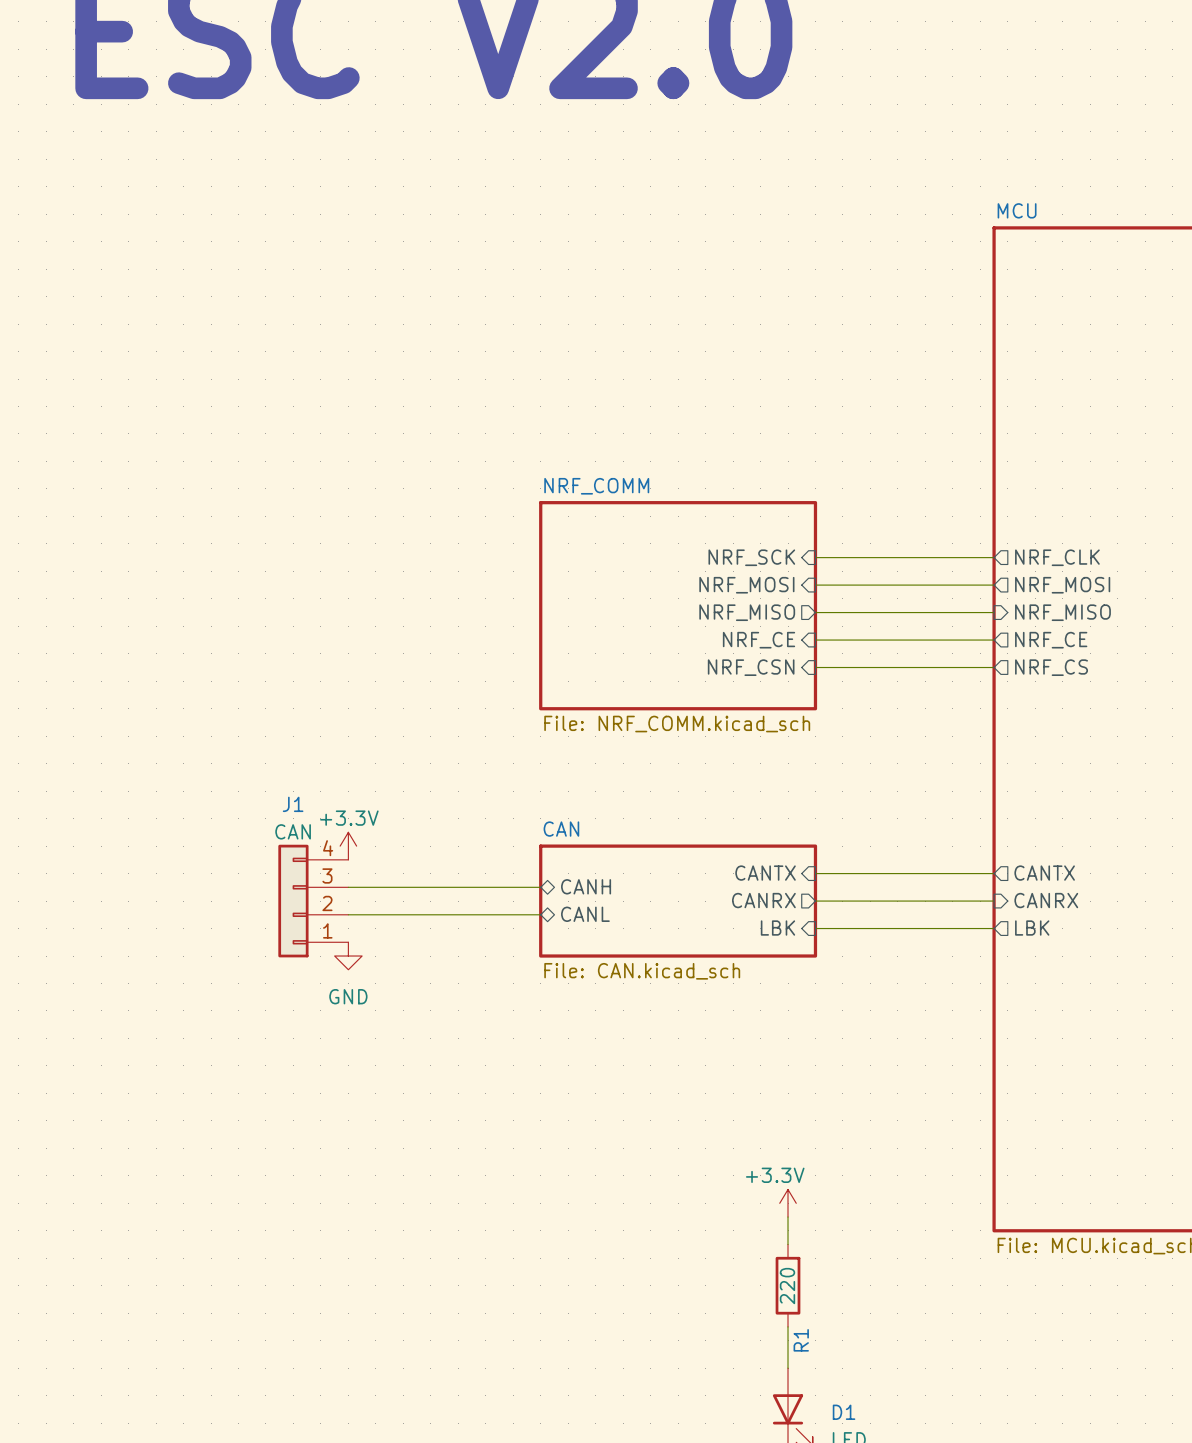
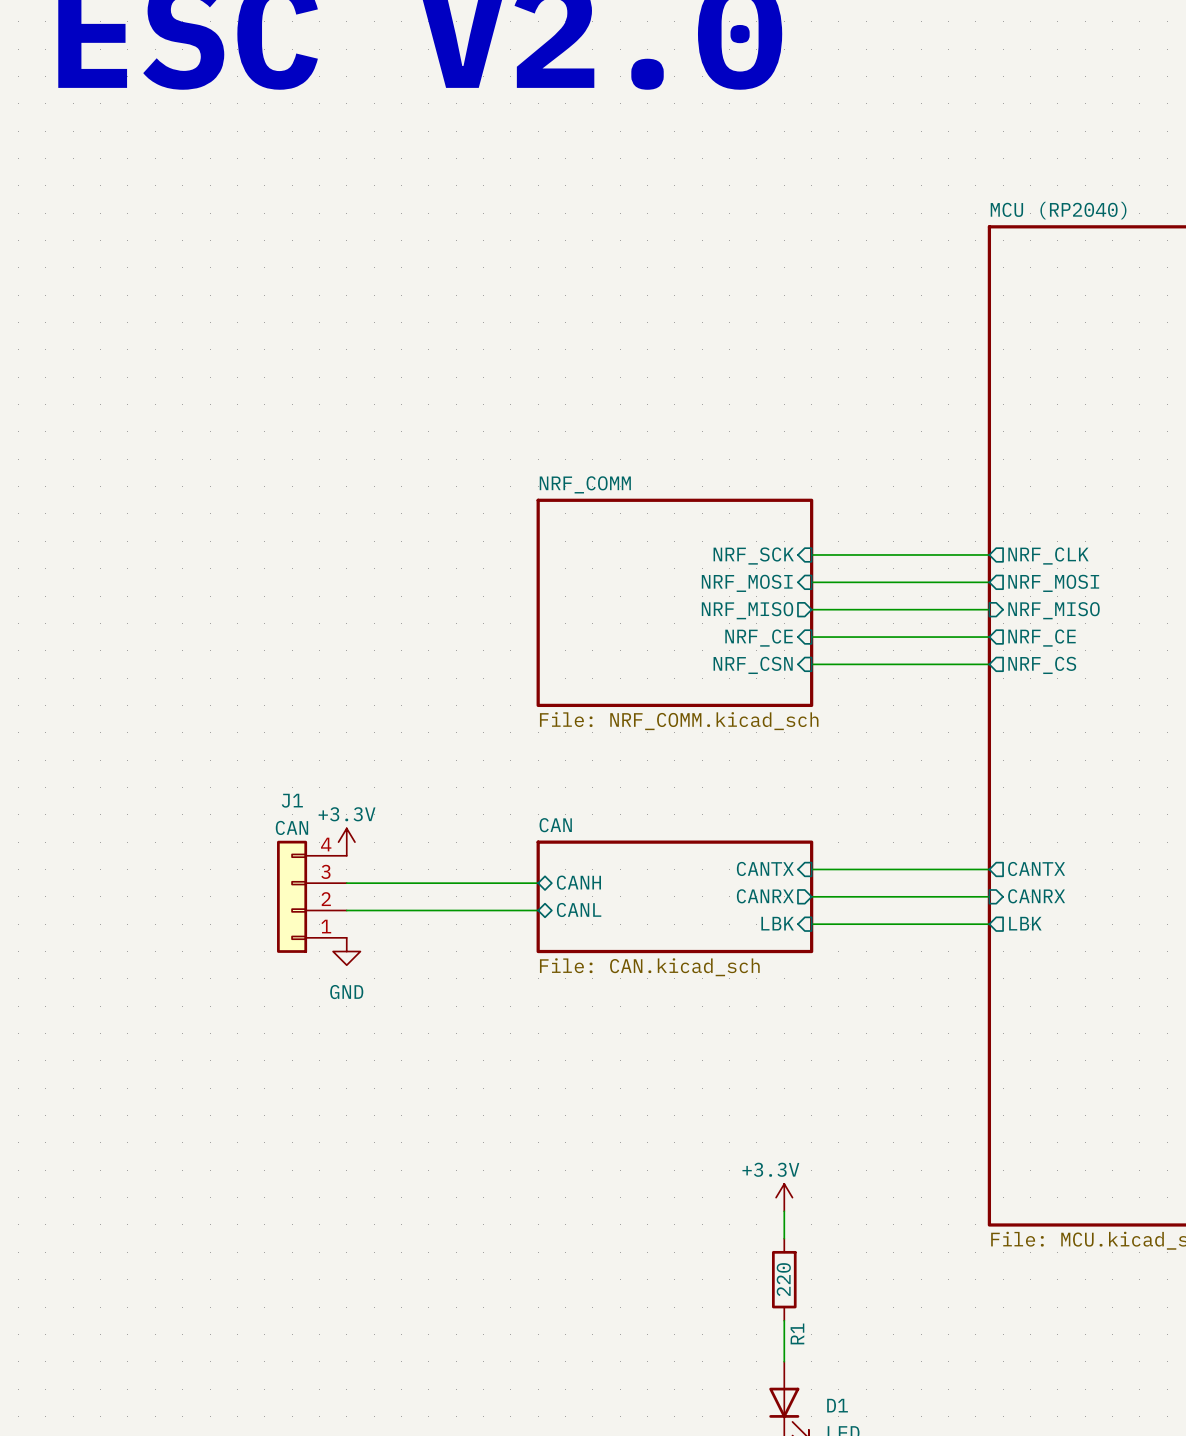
sheet MCU name: MCU (1017, 210) -> MCU (RP2040) (1058, 210)

